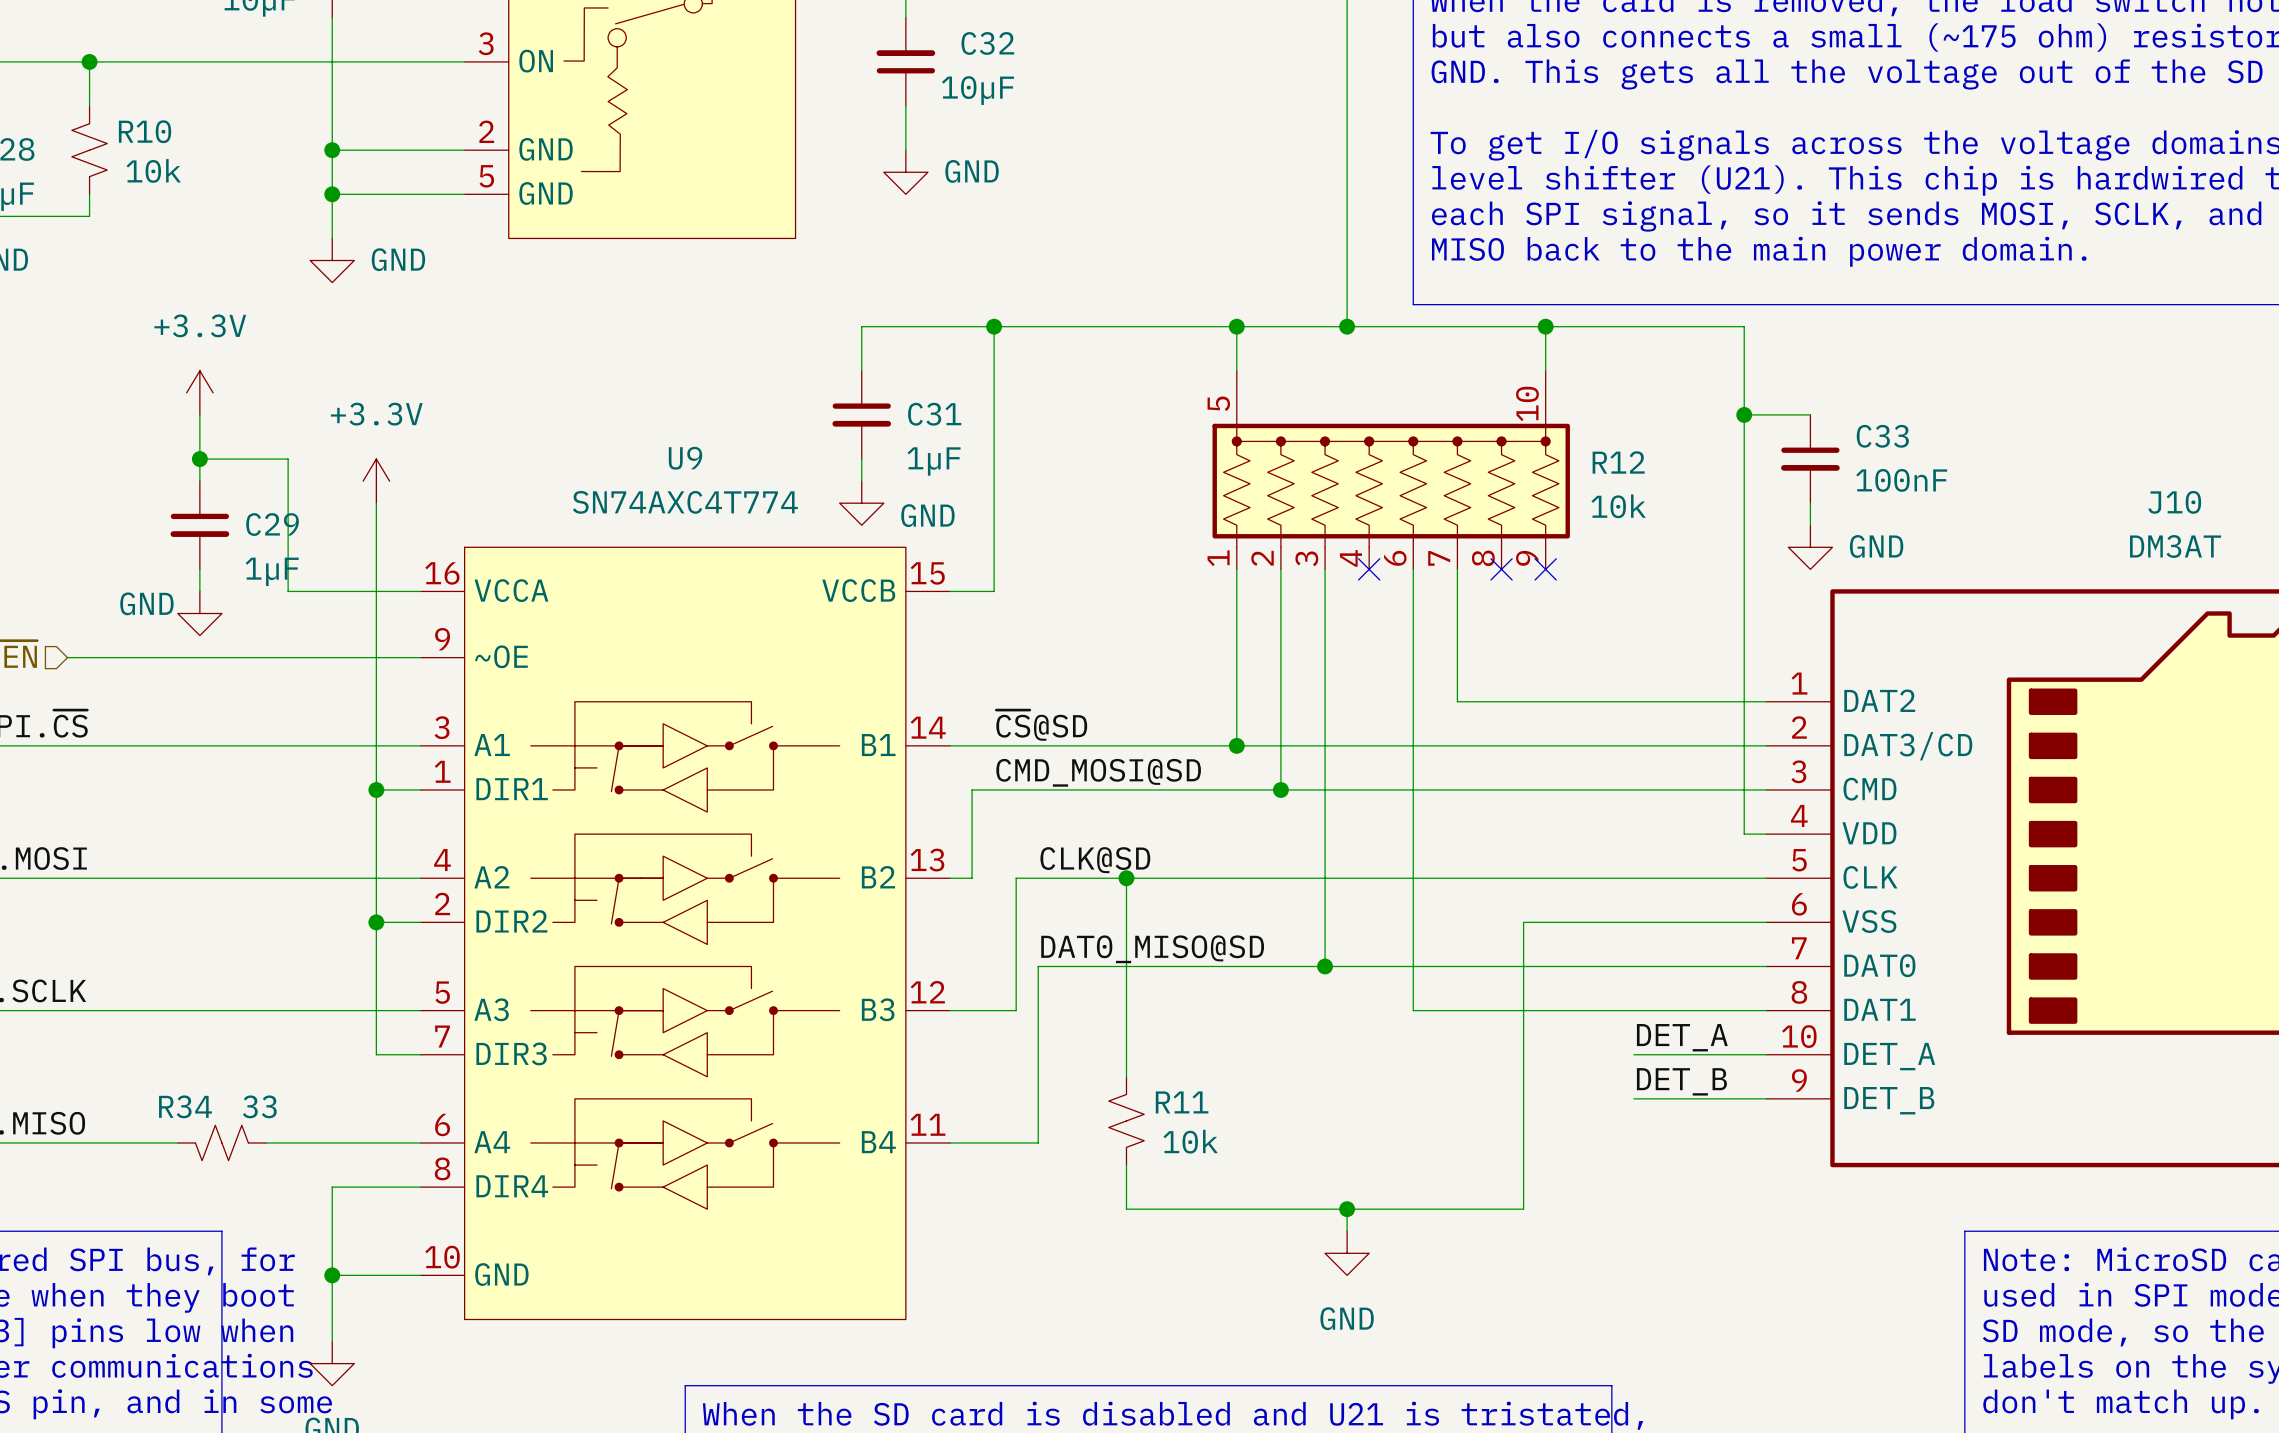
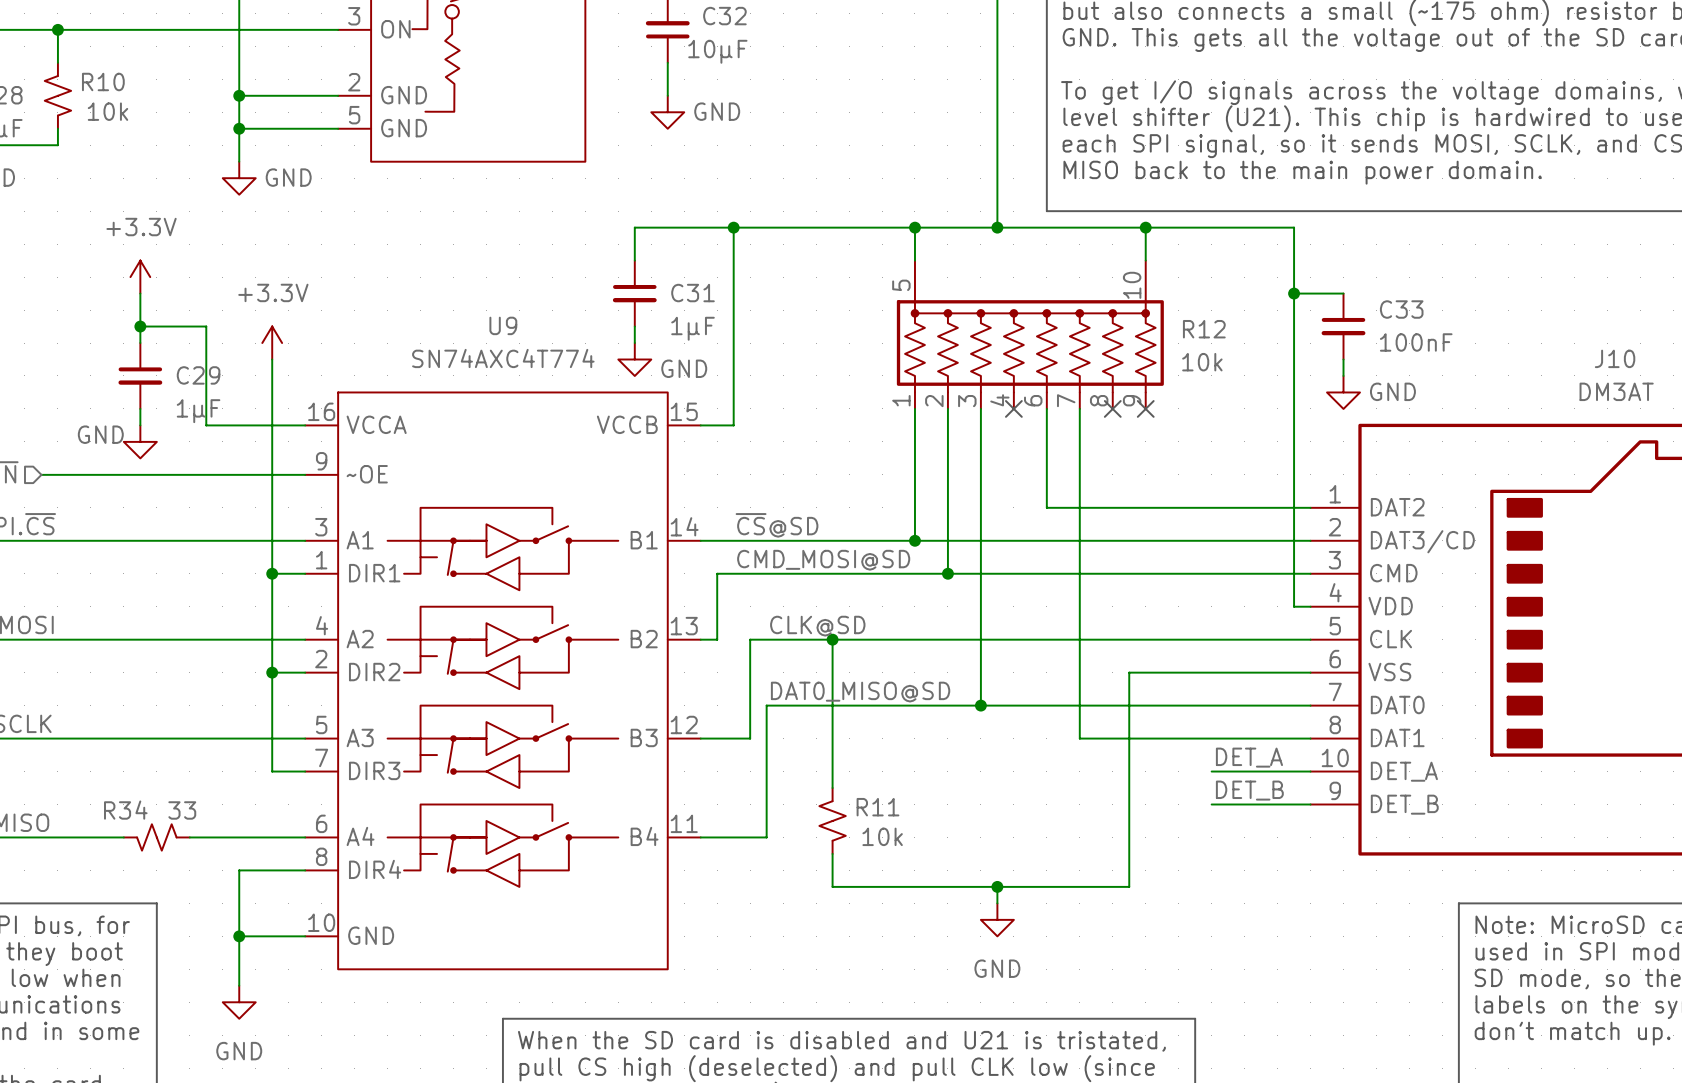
wire: (1413, 701) (1413, 1010) (1457, 1010) -> (1046, 507) (1079, 507) (1079, 738)

